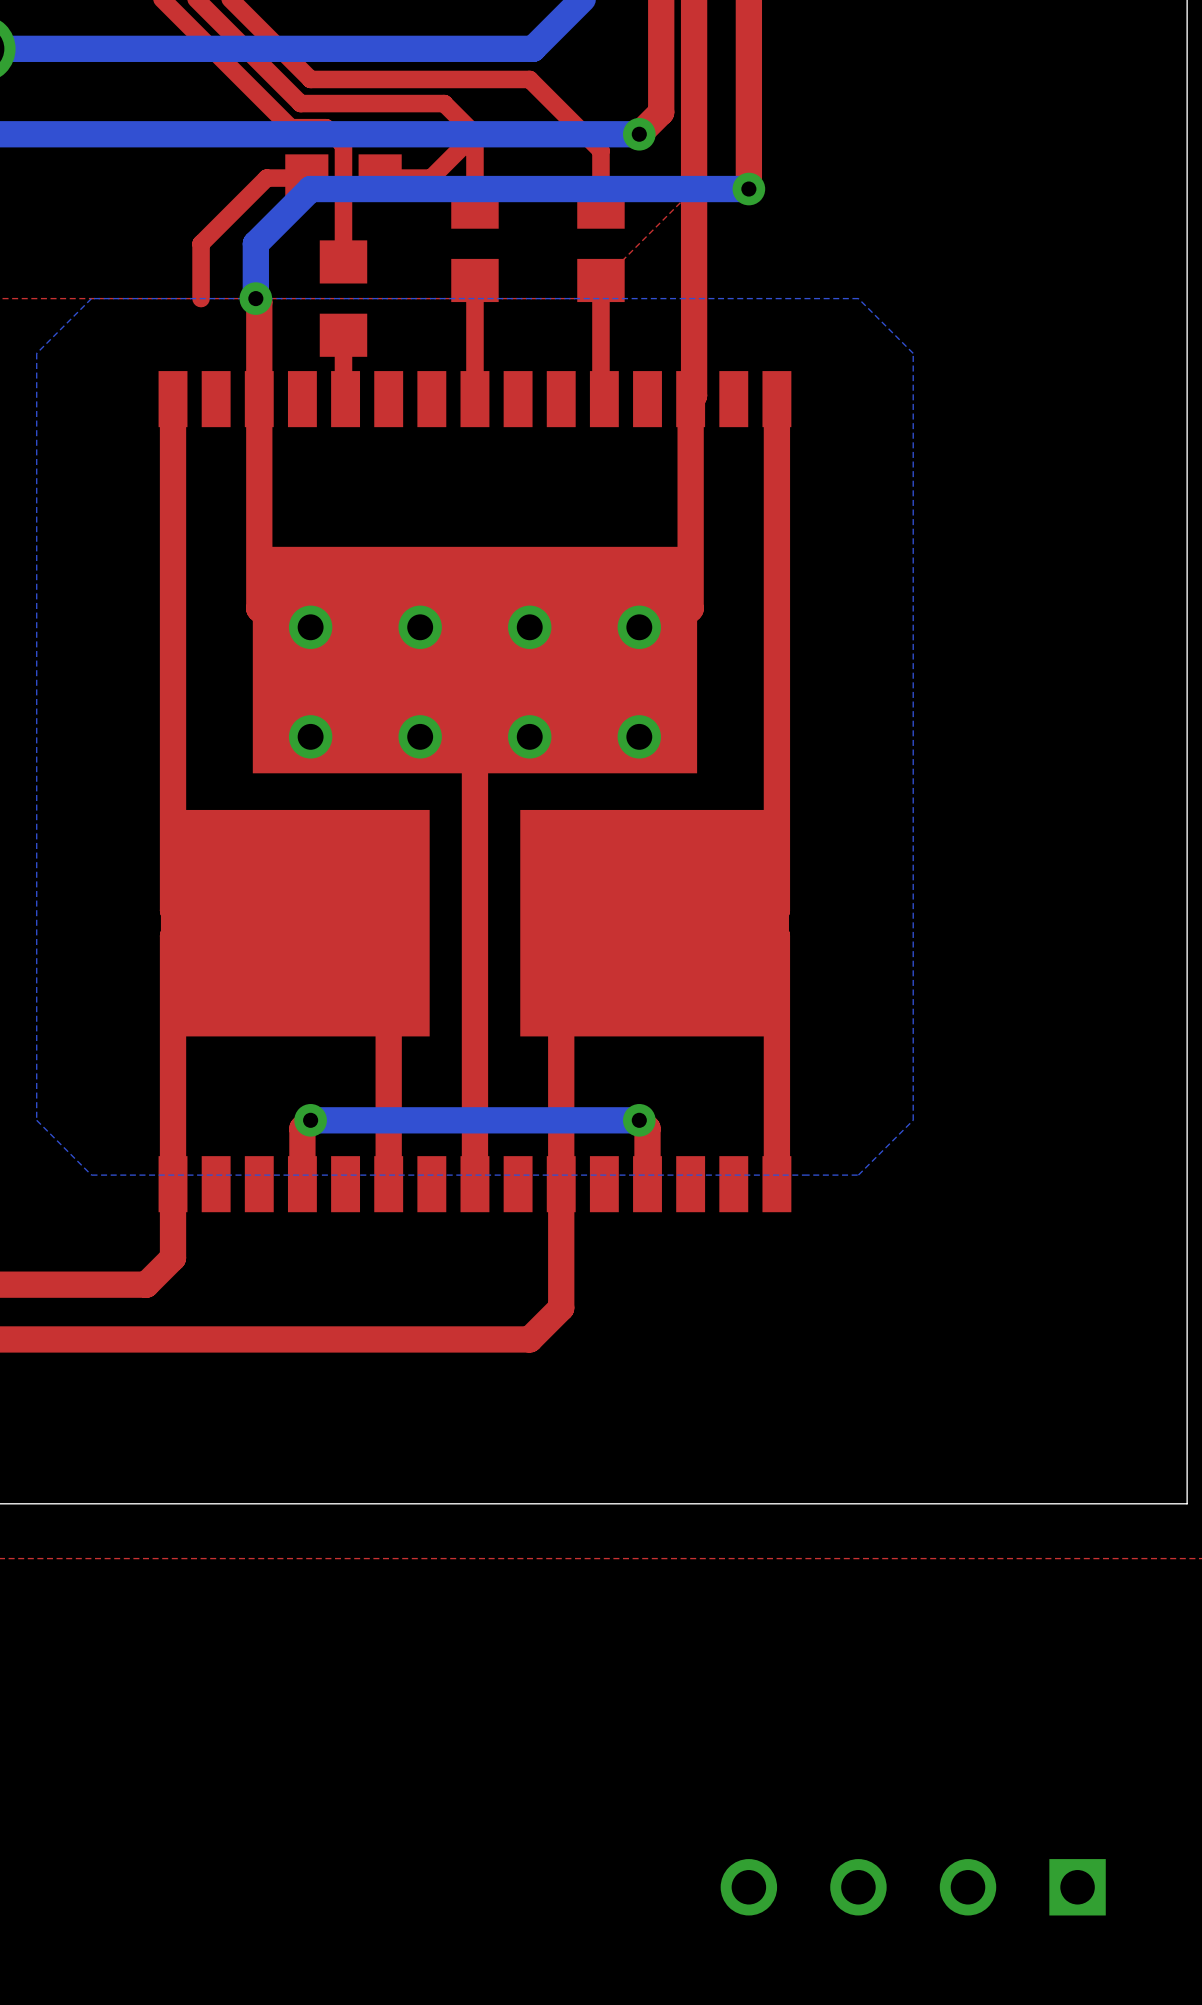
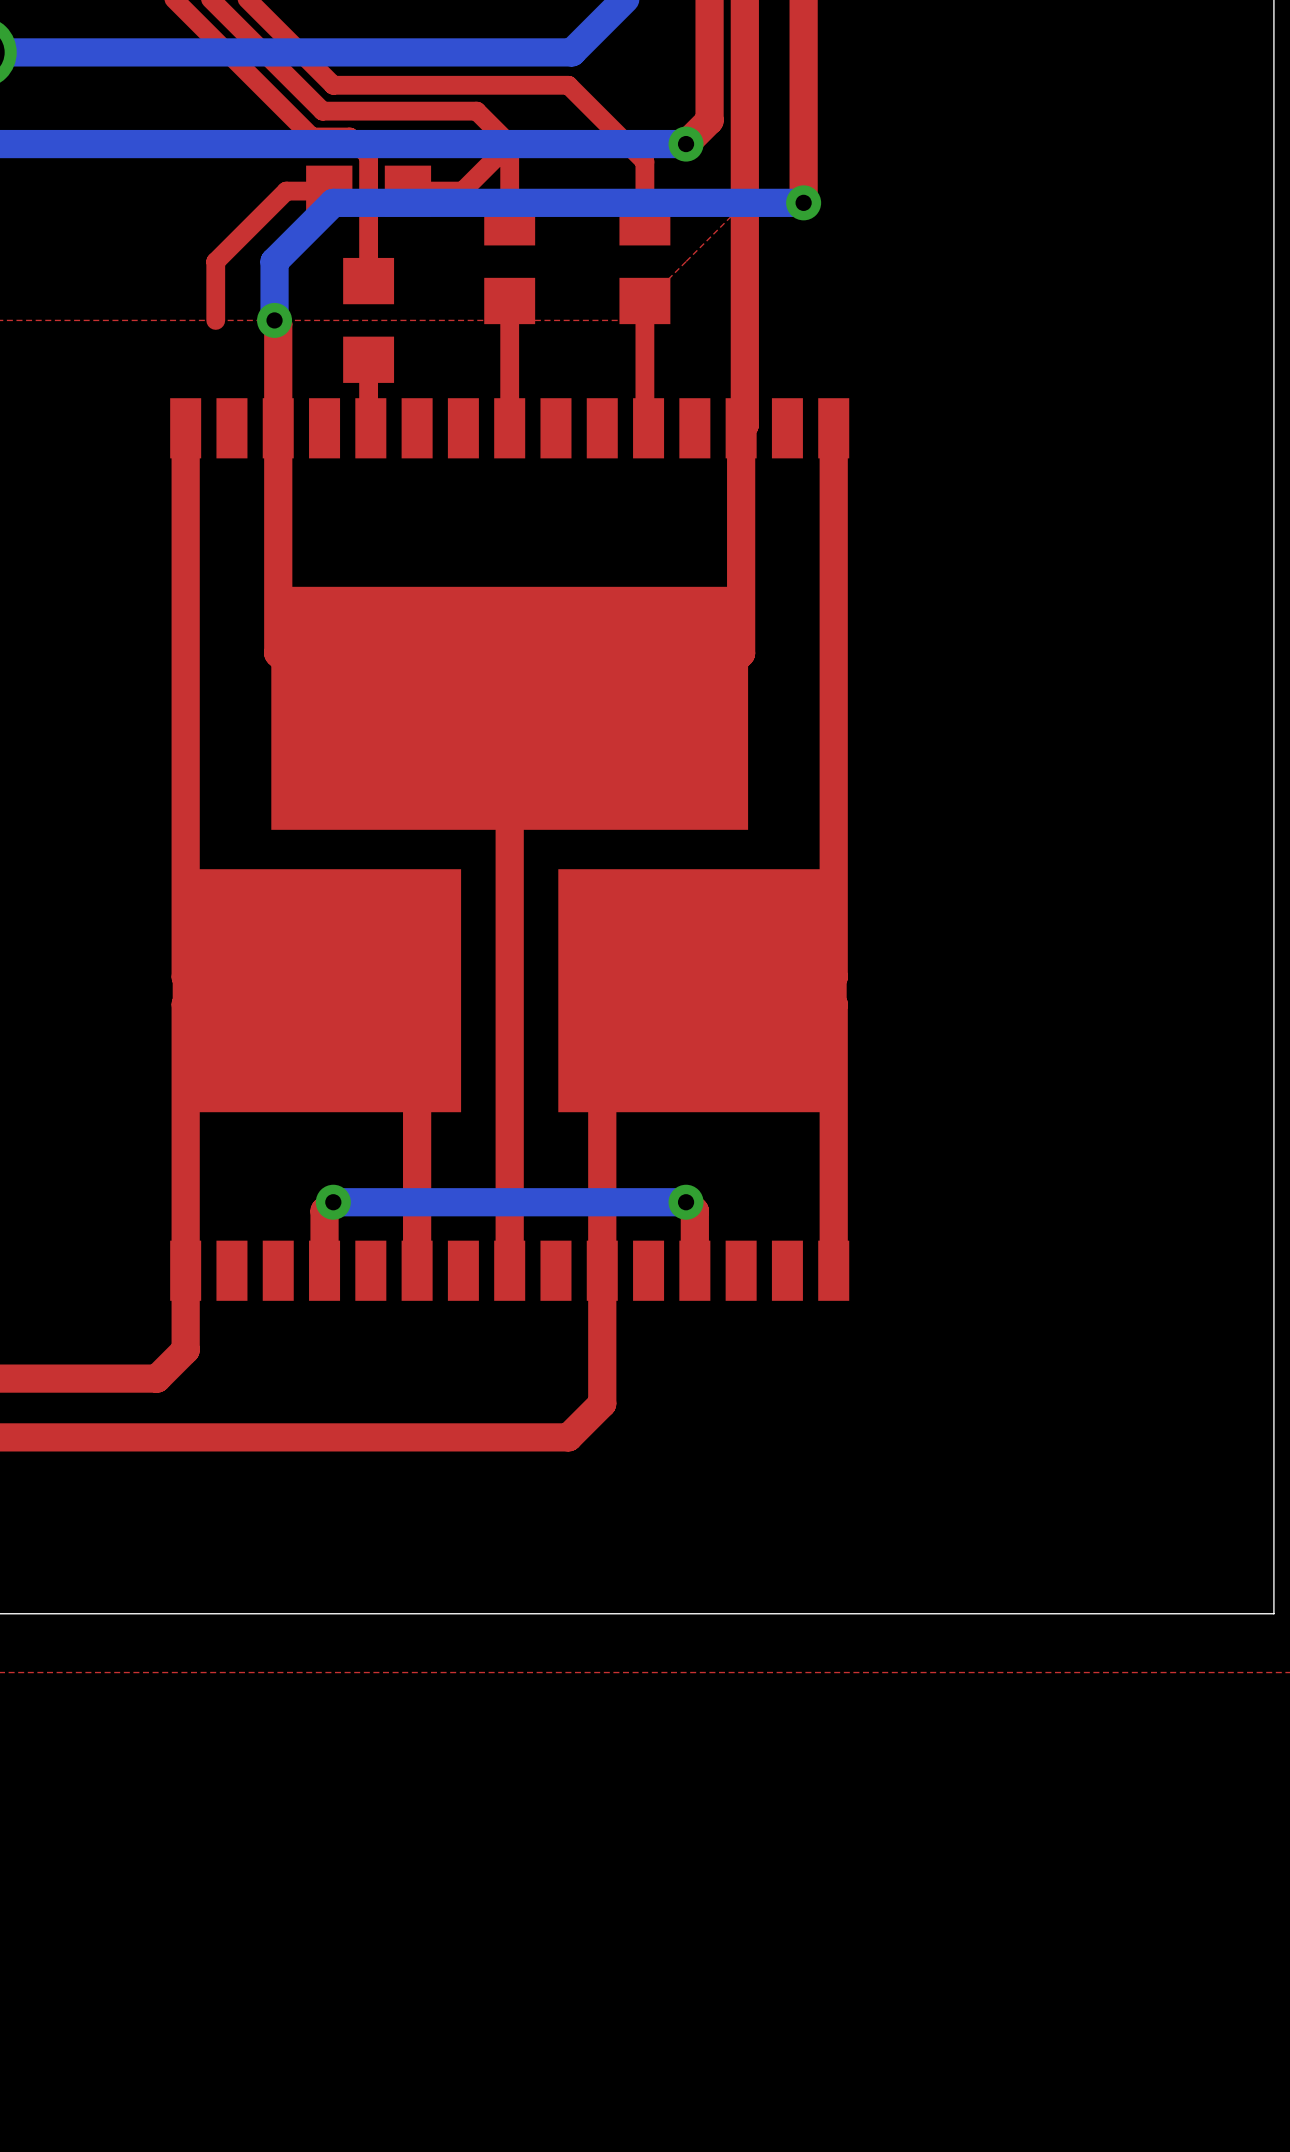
bottom zone outline: (858, 298) (913, 353) (913, 1120) (858, 1175) (91, 1175) (36, 1120) (36, 353) (91, 298) (858, 298) -> none
via: (310, 627) -> none
via: (420, 627) -> none
via: (529, 627) -> none
via: (639, 627) -> none
via: (310, 736) -> none
via: (420, 736) -> none
via: (529, 736) -> none
via: (639, 736) -> none
part: (913, 1887) -> none

